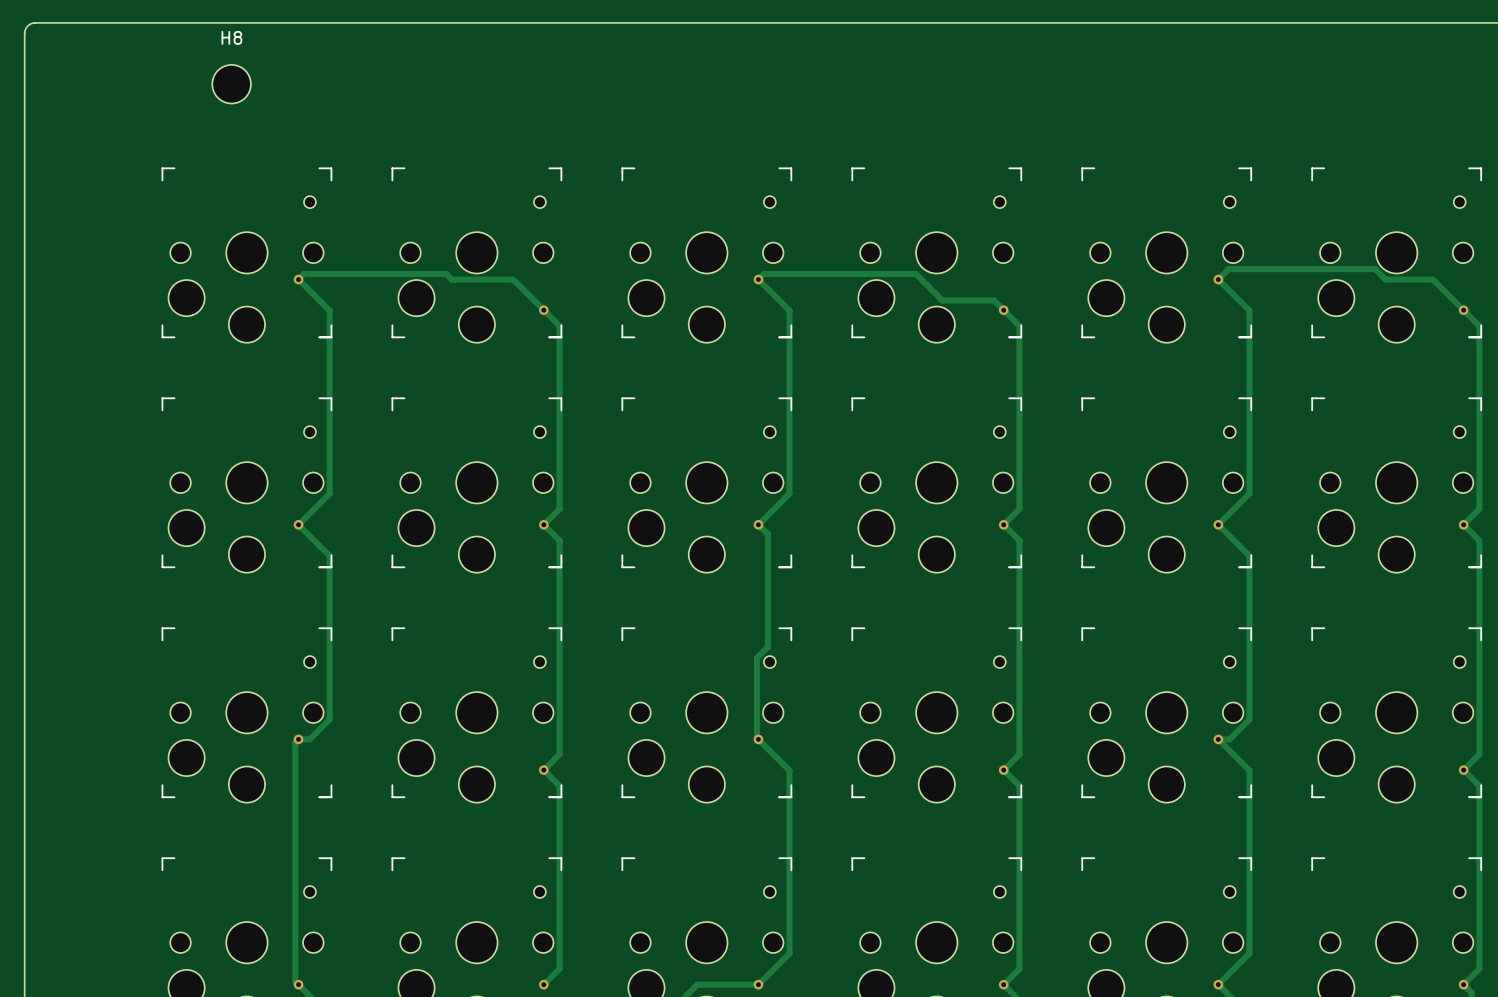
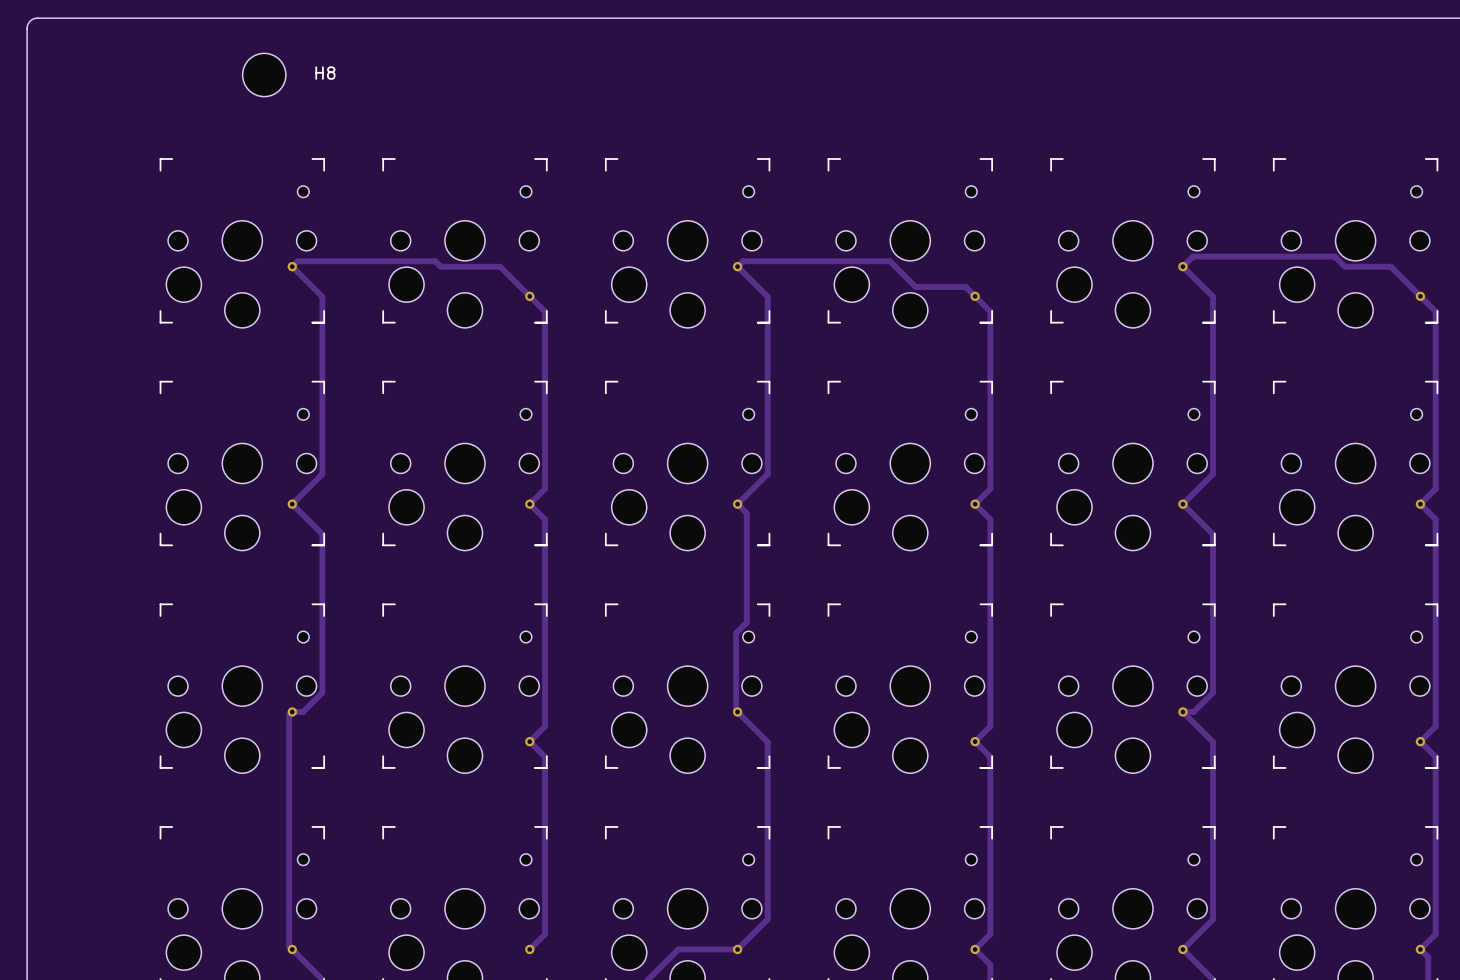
H8 name position: H8 (231, 37) -> H8 (325, 73)
H8 footprint: [212, 64, 251, 104] -> [242, 53, 286, 97]

